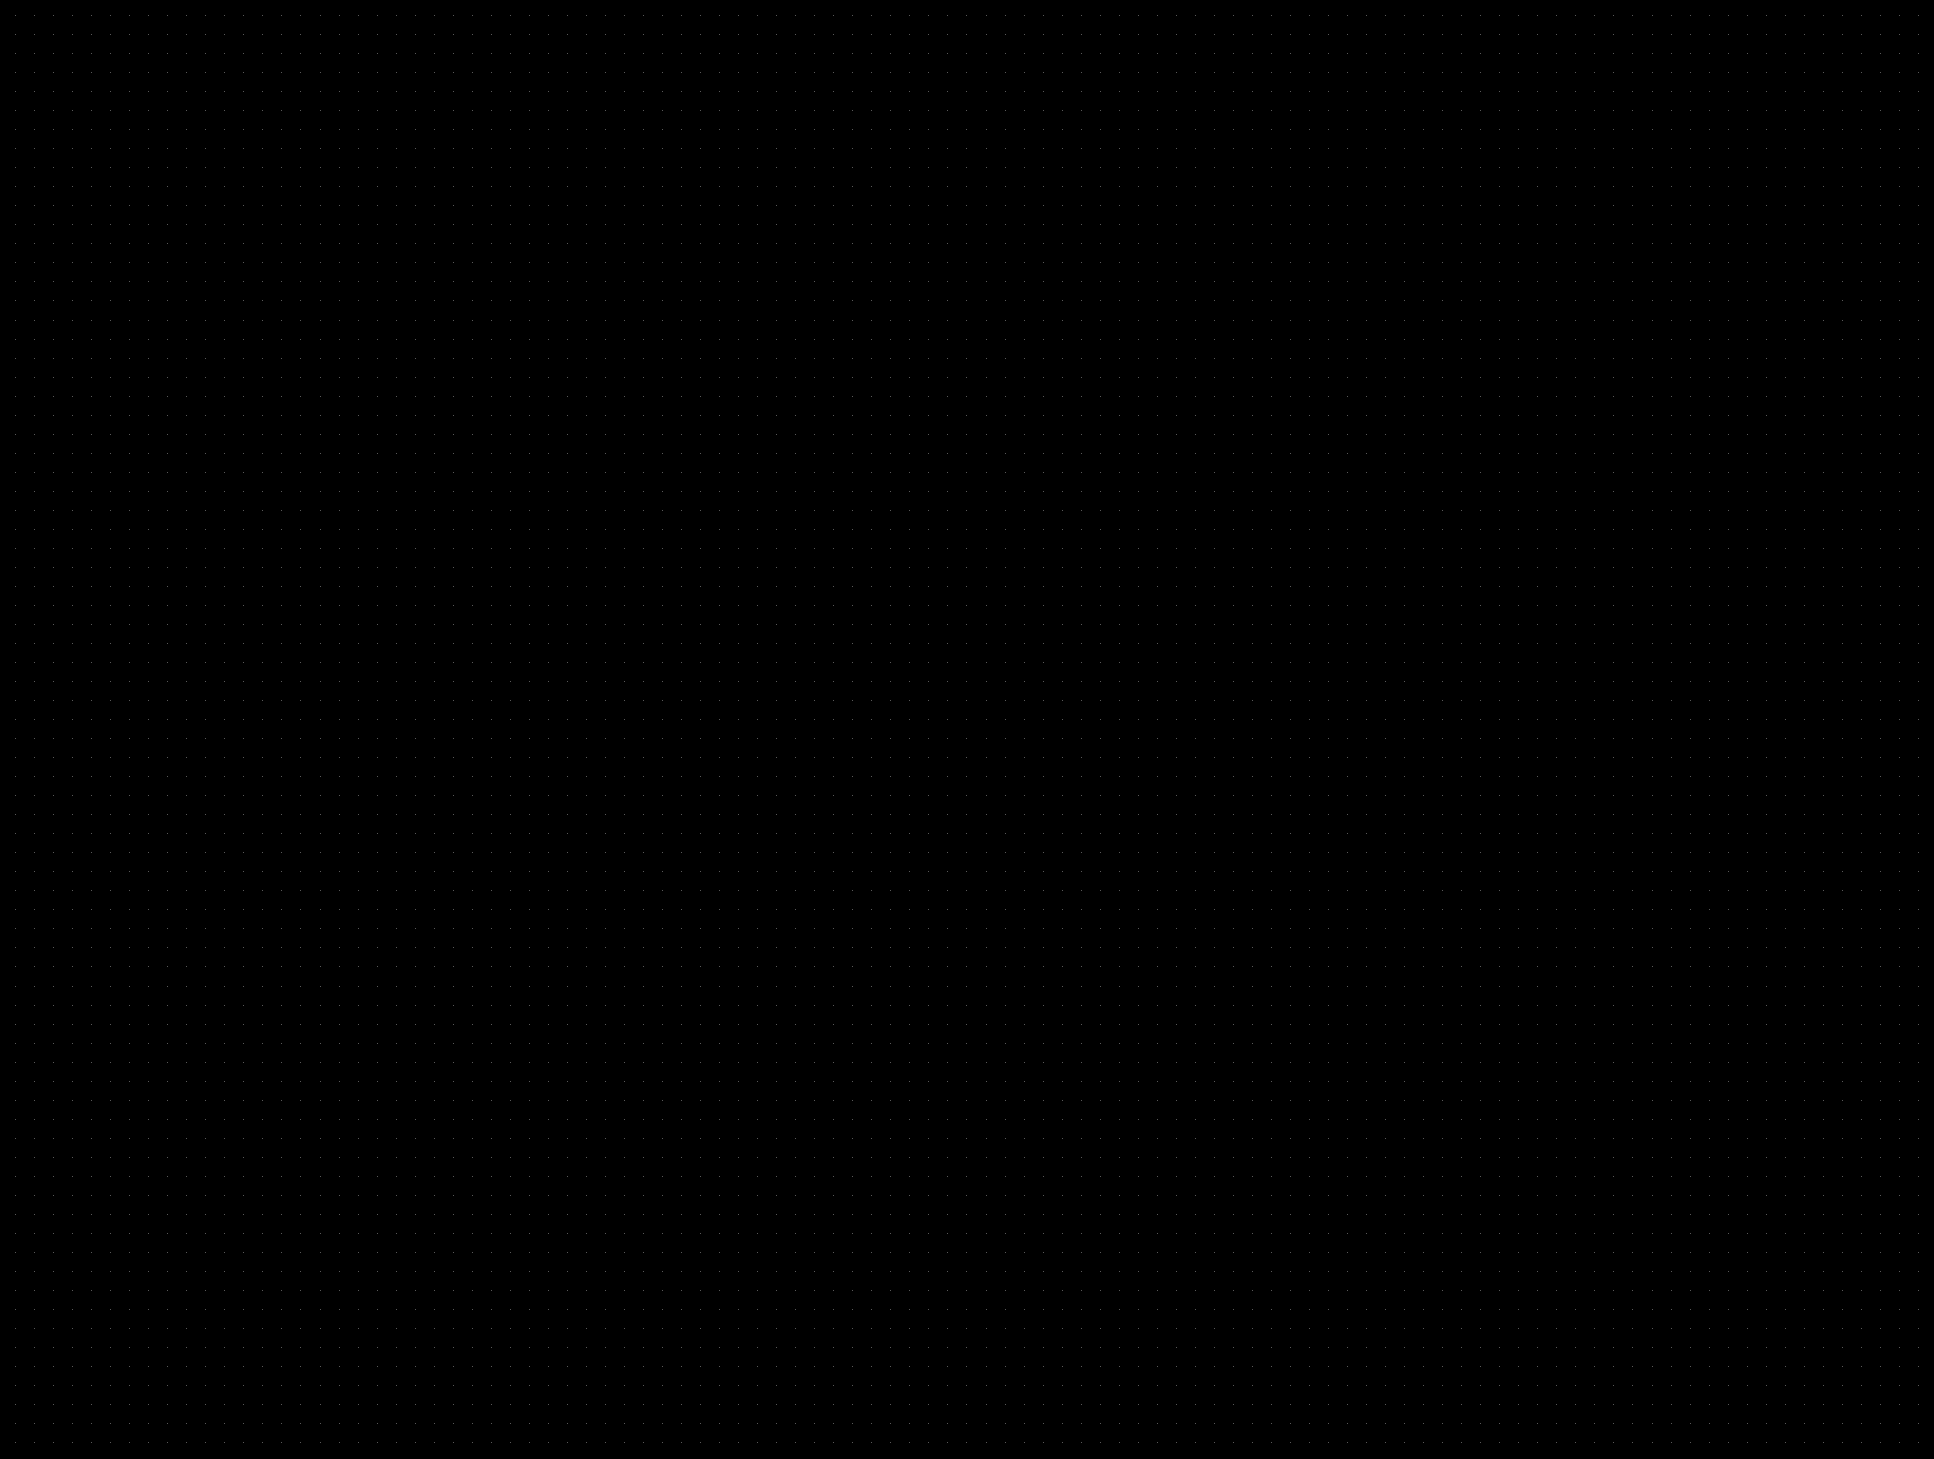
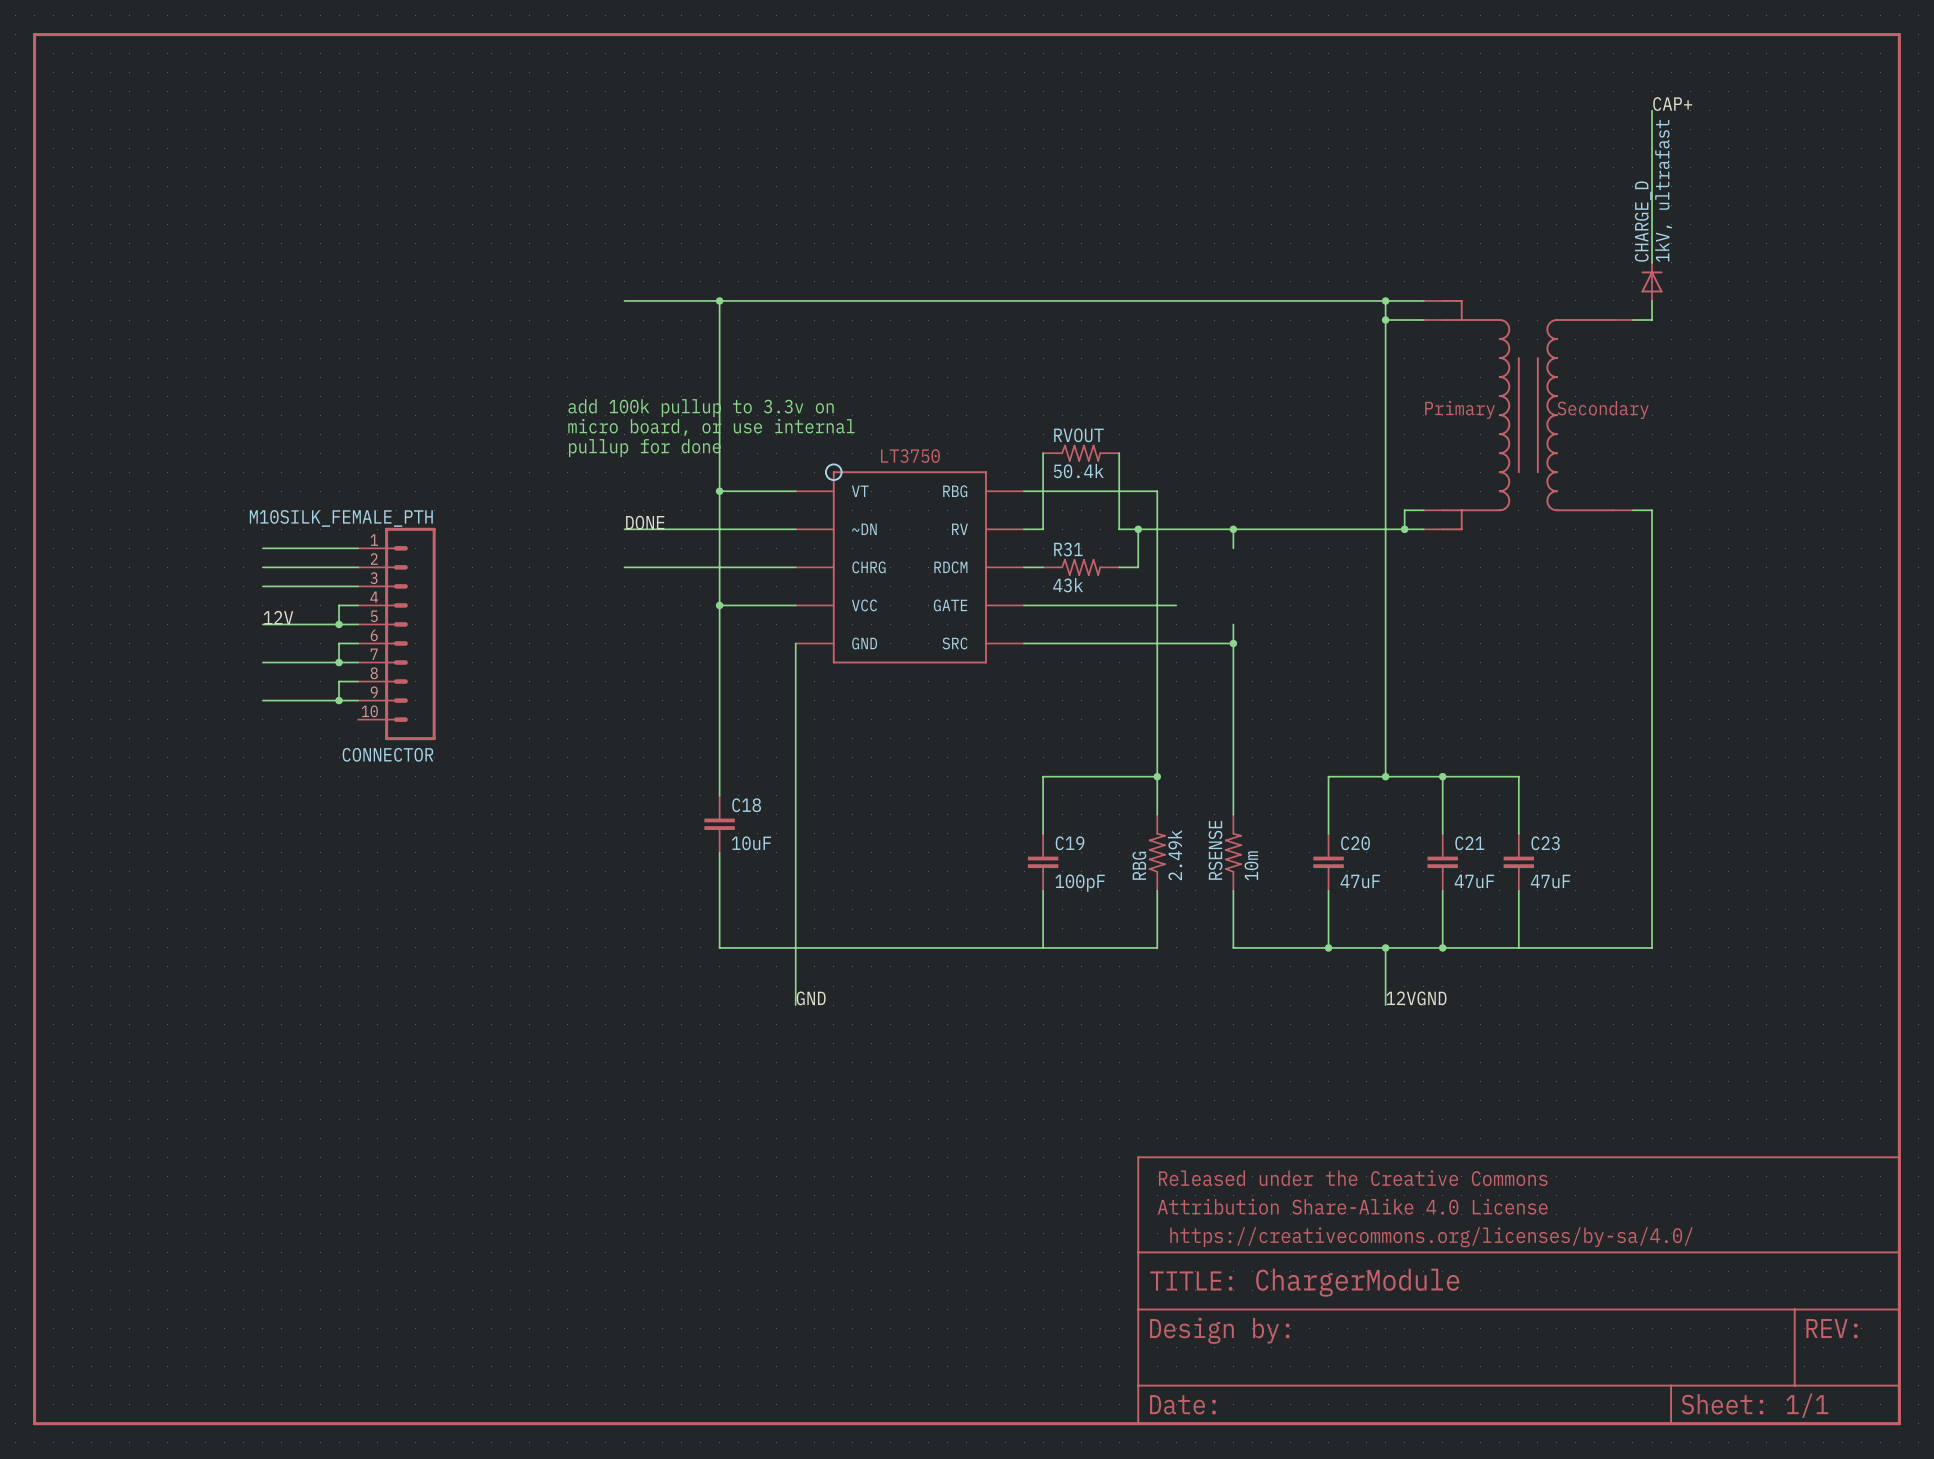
label: none -> CAP+ (1672, 104)
wire: none -> (1652, 110) (1652, 262)
CHARGE_D: none -> 1kV, ultrafast (1652, 281)
wire: none -> (624, 300) (1423, 300)
wire: none -> (719, 300) (719, 795)
junction: none -> (719, 300)
wire: none -> (1385, 300) (1385, 776)
junction: none -> (1385, 300)
wire: none -> (1652, 300) (1652, 320) (1632, 320)
wire: none -> (1385, 320) (1423, 320)
junction: none -> (1385, 320)
text: none -> add 100k pullup to 3.3v on (701, 408)
part: none -> (1528, 415)
text: none -> micro board, or use internal (711, 427)
text: none -> pullup for done (644, 448)
wire: none -> (1043, 453) (1043, 529) (1024, 529)
RVOUT: none -> 50.4k (1081, 453)
wire: none -> (1119, 453) (1119, 529) (1423, 529)
wire: none -> (719, 491) (795, 491)
junction: none -> (719, 491)
wire: none -> (1024, 491) (1157, 491) (1157, 814)
wire: none -> (1423, 510) (1404, 510) (1404, 529)
wire: none -> (1632, 510) (1652, 510) (1652, 947) (1233, 947) (1233, 890)
label: none -> DONE (645, 522)
wire: none -> (624, 529) (795, 529)
wire: none -> (1138, 529) (1138, 567) (1119, 567)
junction: none -> (1138, 529)
wire: none -> (1233, 529) (1233, 548)
junction: none -> (1233, 529)
junction: none -> (1404, 529)
wire: none -> (262, 548) (358, 548)
part: none -> (909, 563)
wire: none -> (262, 567) (358, 567)
wire: none -> (624, 567) (795, 567)
wire: none -> (1024, 567) (1043, 567)
R31: none -> 43k (1081, 567)
wire: none -> (262, 586) (358, 586)
wire: none -> (358, 605) (339, 605) (339, 624)
wire: none -> (719, 605) (795, 605)
junction: none -> (719, 605)
wire: none -> (1024, 605) (1176, 605)
label: none -> 12V (278, 617)
wire: none -> (262, 624) (358, 624)
junction: none -> (339, 624)
wire: none -> (1233, 624) (1233, 814)
CONNECTOR: none -> M10SILK_FEMALE_PTH (396, 633)
wire: none -> (358, 643) (339, 643) (339, 662)
wire: none -> (795, 643) (795, 1005)
wire: none -> (1024, 643) (1233, 643)
junction: none -> (1233, 643)
wire: none -> (262, 662) (358, 662)
junction: none -> (339, 662)
wire: none -> (358, 681) (339, 681) (339, 700)
wire: none -> (262, 700) (358, 700)
junction: none -> (339, 700)
part: none -> (966, 729)
wire: none -> (1157, 776) (1043, 776) (1043, 833)
junction: none -> (1157, 776)
junction: none -> (1385, 776)
wire: none -> (1442, 776) (1442, 833)
junction: none -> (1442, 776)
C18: none -> 10uF (719, 824)
wire: none -> (1328, 833) (1328, 776) (1518, 776) (1518, 833)
wire: none -> (719, 852) (719, 947) (1157, 947) (1157, 890)
RBG: none -> 2.49k (1157, 852)
RSENSE: none -> 10m (1233, 852)
C19: none -> 100pF (1043, 862)
C20: none -> 47uF (1328, 862)
C21: none -> 47uF (1442, 862)
C23: none -> 47uF (1518, 862)
wire: none -> (1043, 890) (1043, 947)
wire: none -> (1328, 890) (1328, 947)
wire: none -> (1442, 890) (1442, 947)
wire: none -> (1518, 890) (1518, 947)
junction: none -> (1328, 947)
wire: none -> (1385, 947) (1385, 1005)
junction: none -> (1385, 947)
junction: none -> (1442, 947)
label: none -> GND (811, 998)
label: none -> 12VGND (1416, 998)
part: none -> (1518, 1290)

